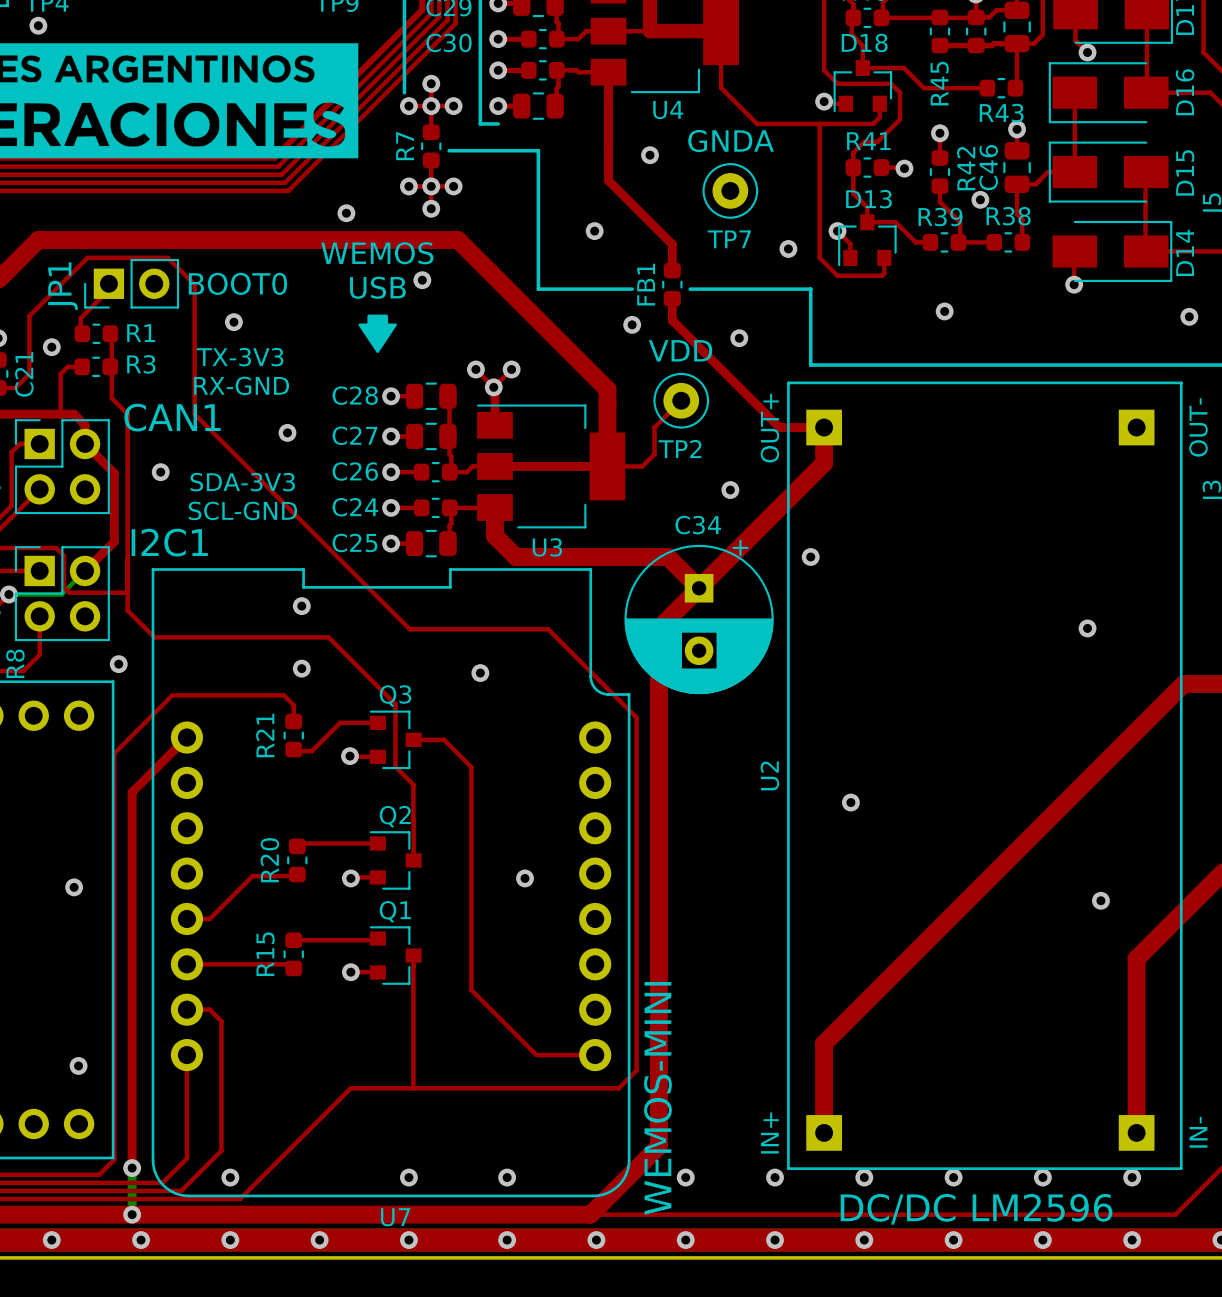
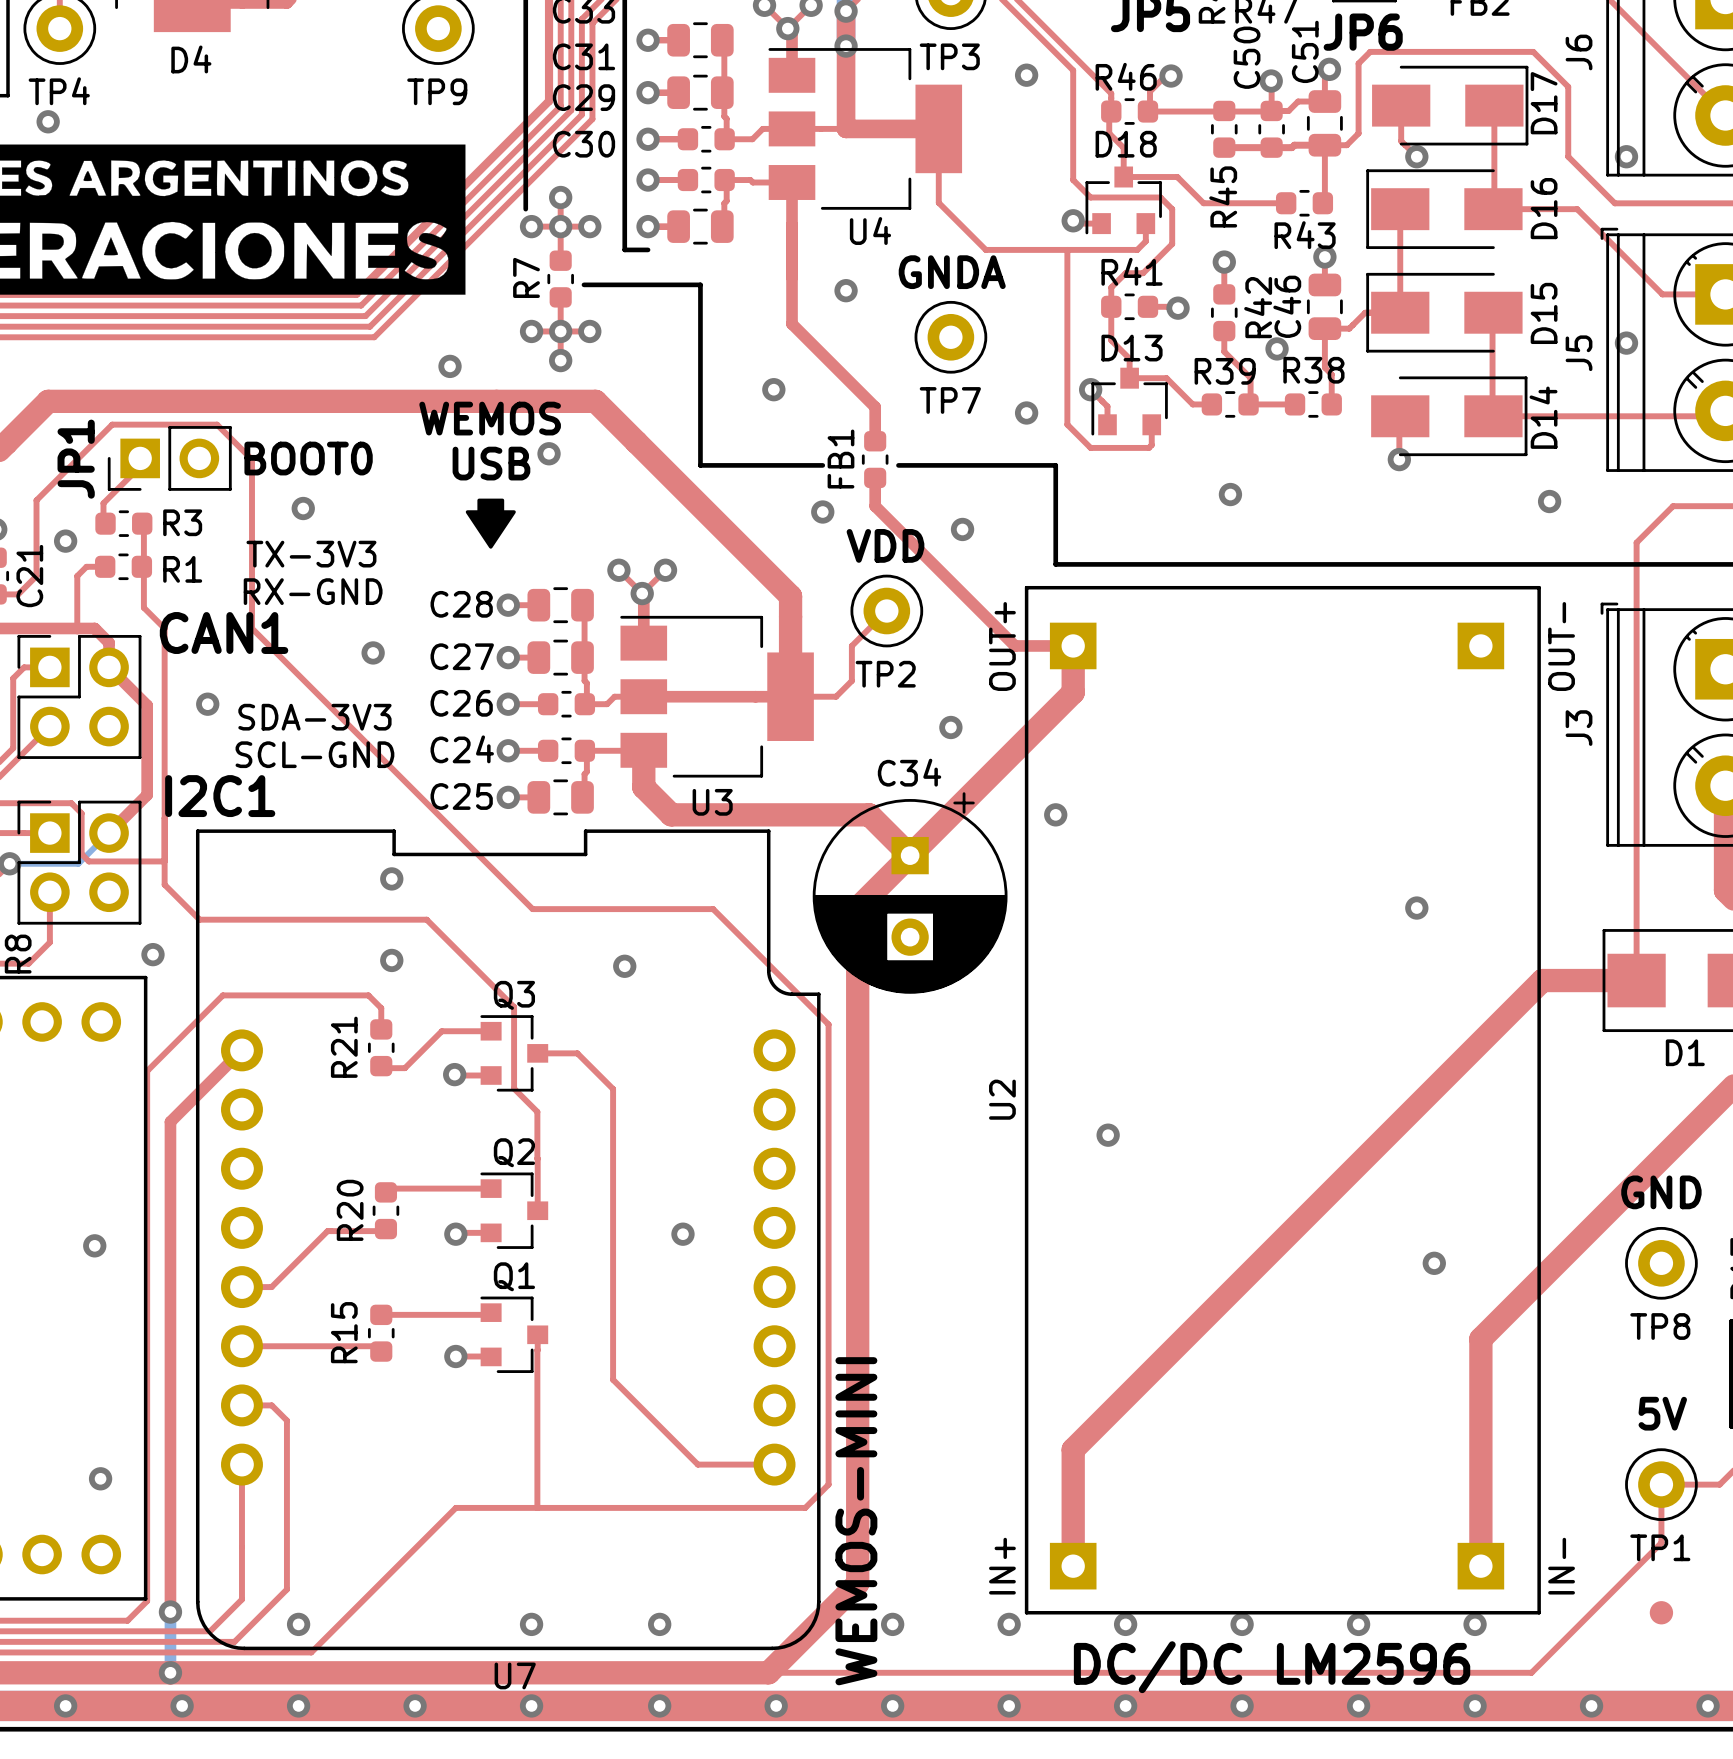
R1 name position: R1 (141, 333) -> R1 (182, 569)
R3 name position: R3 (141, 364) -> R3 (182, 522)

